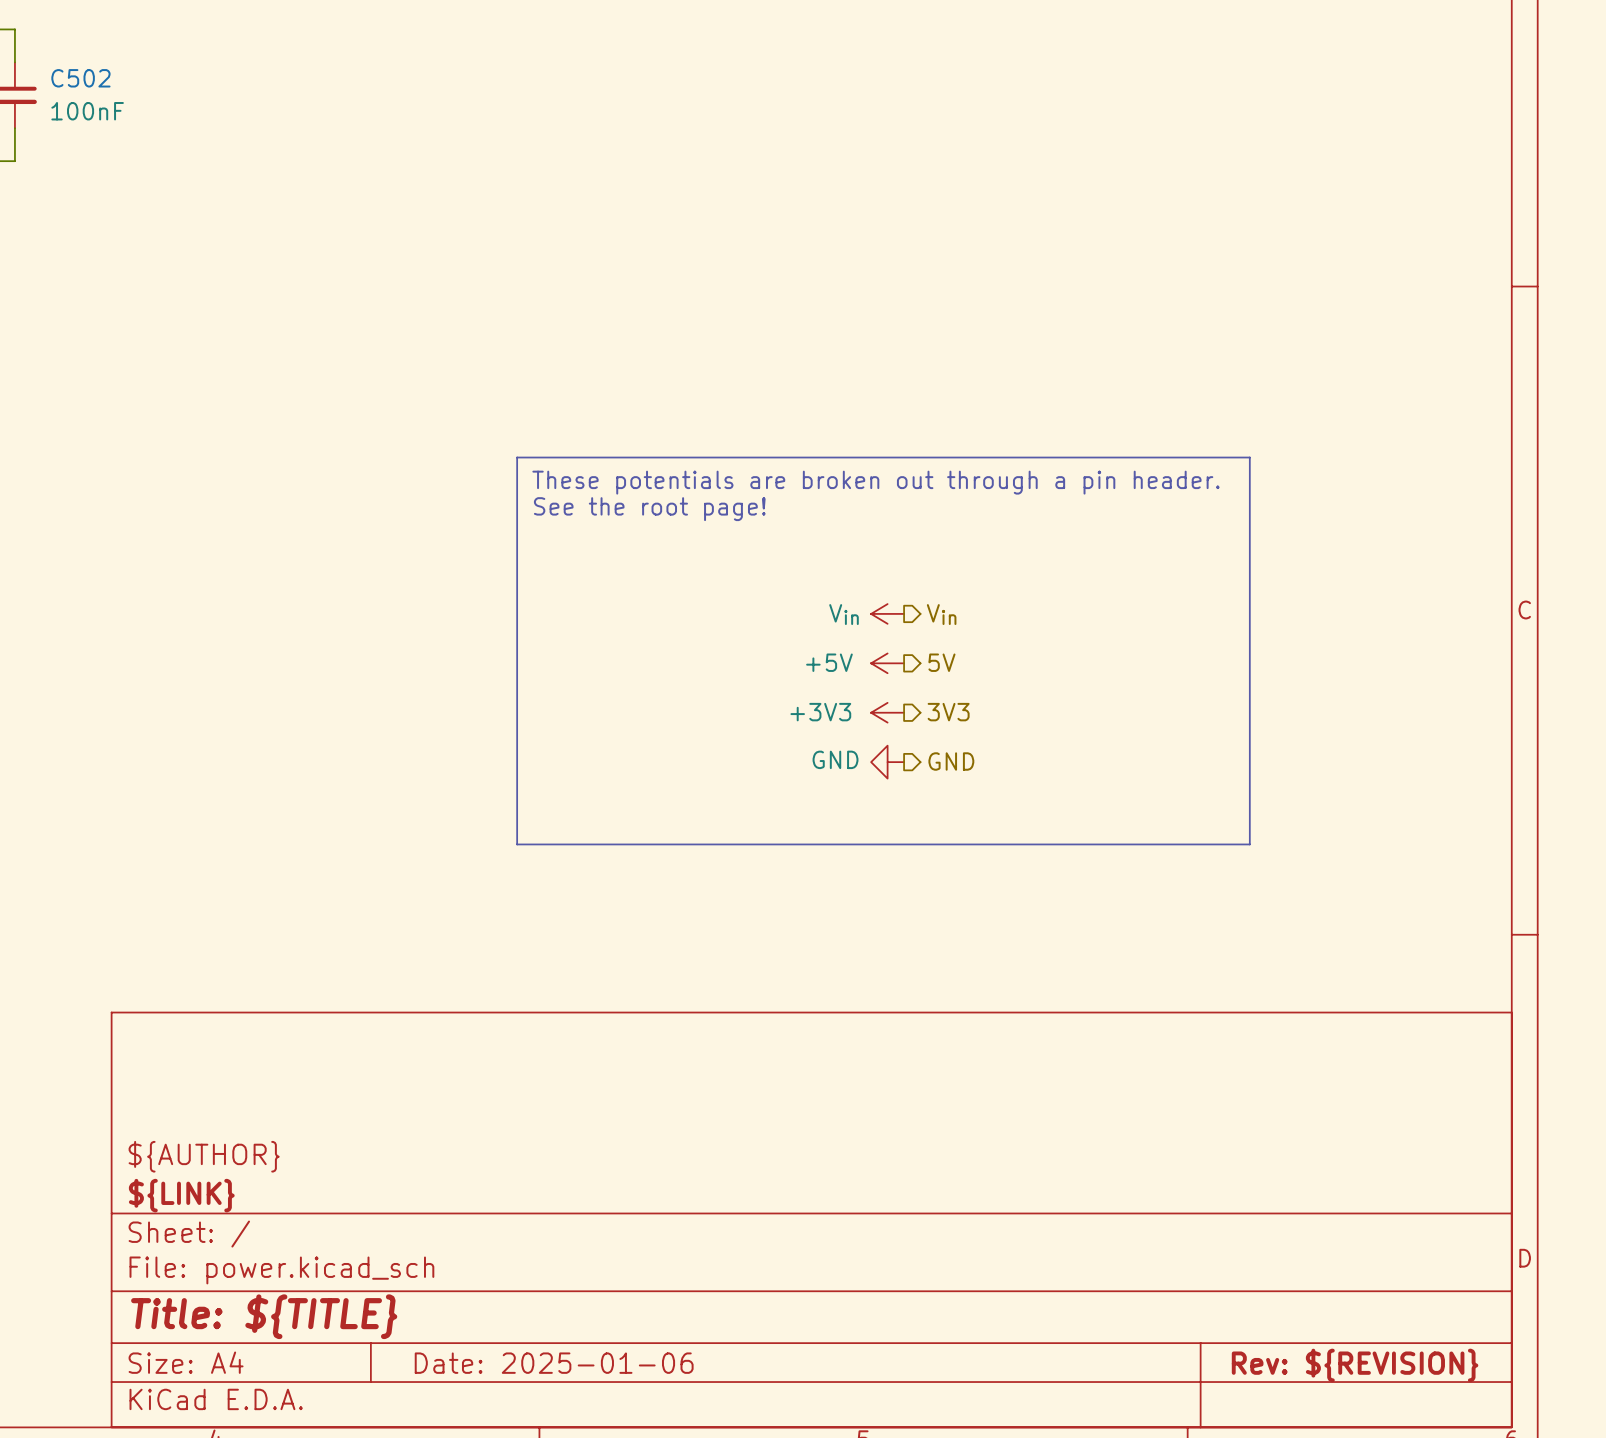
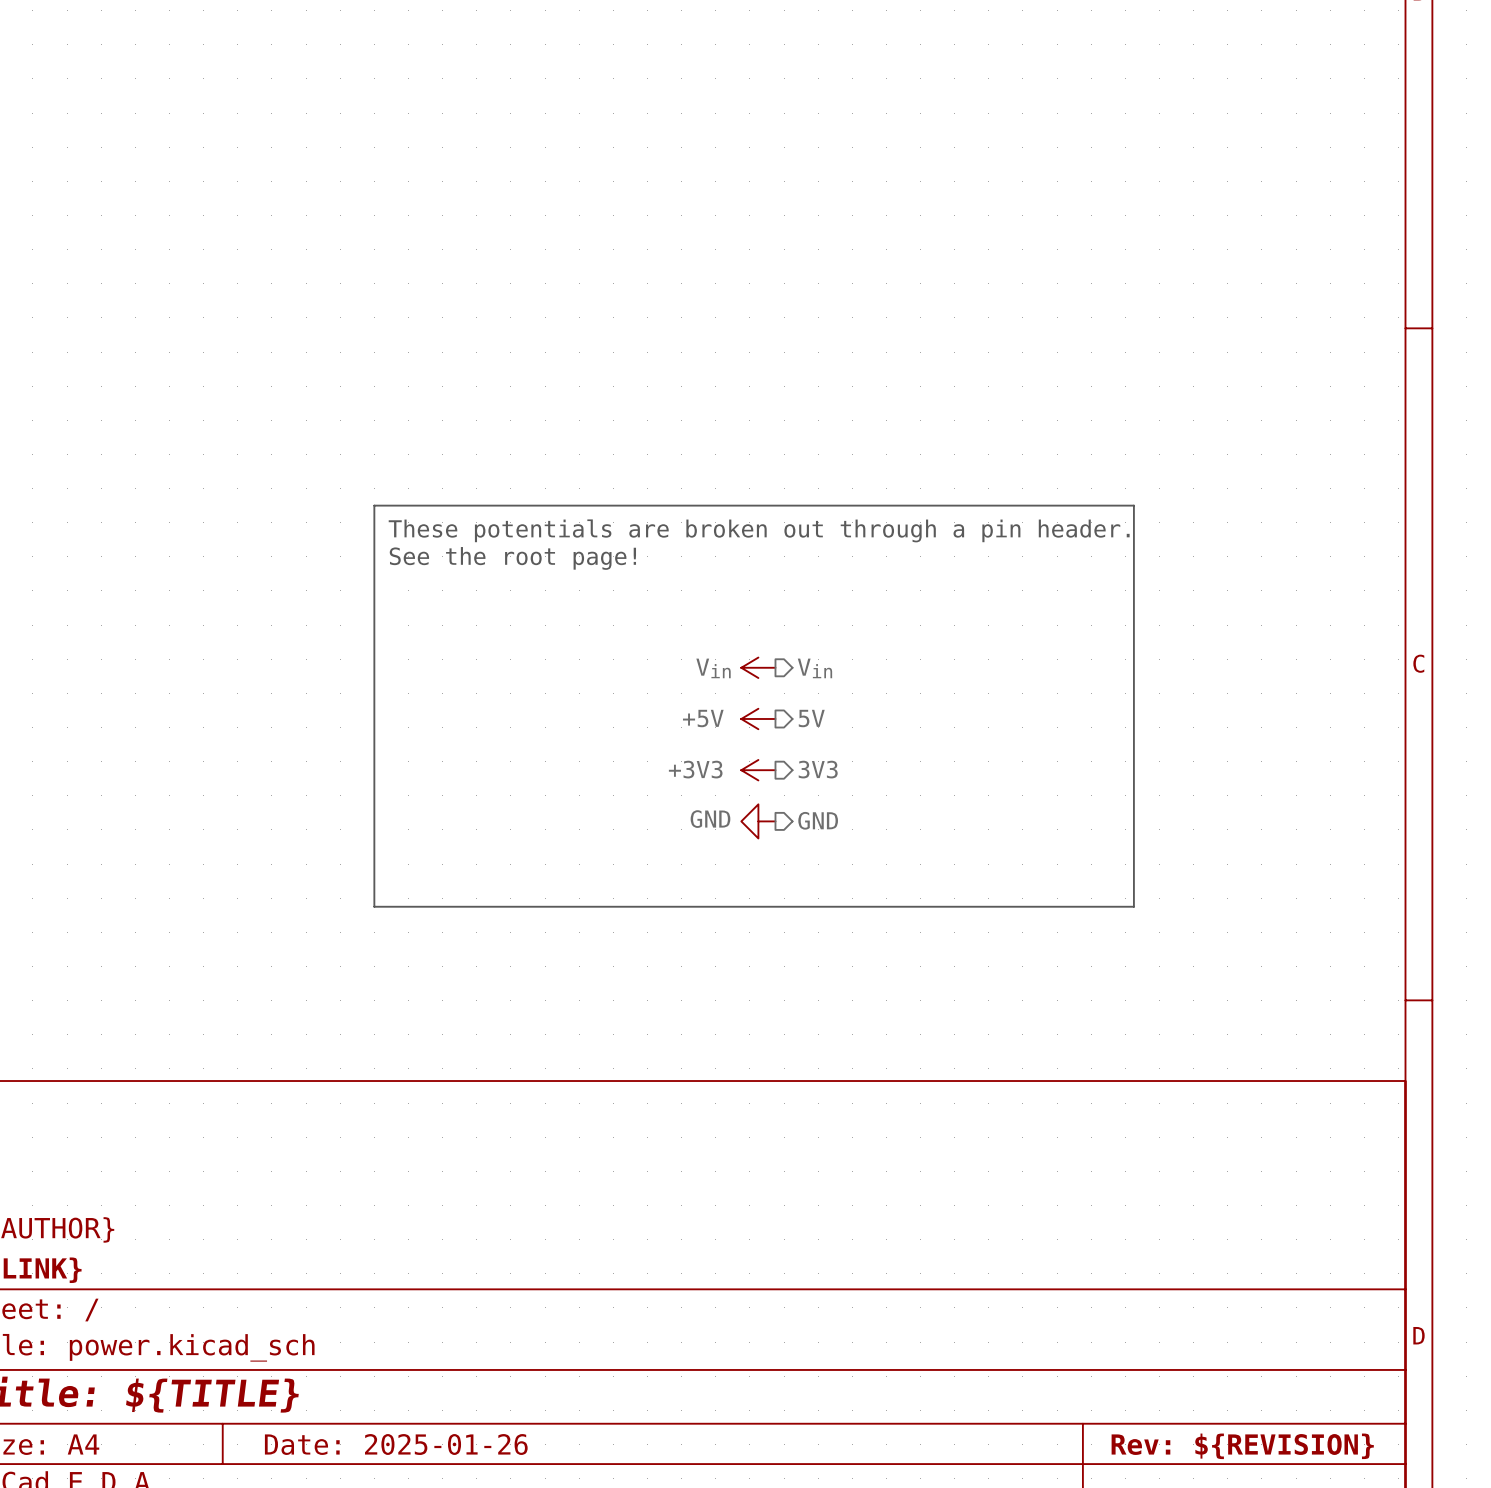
title block: Date: 2025-01-06 (554, 1363) -> Date: 2025-01-26 (396, 1444)

